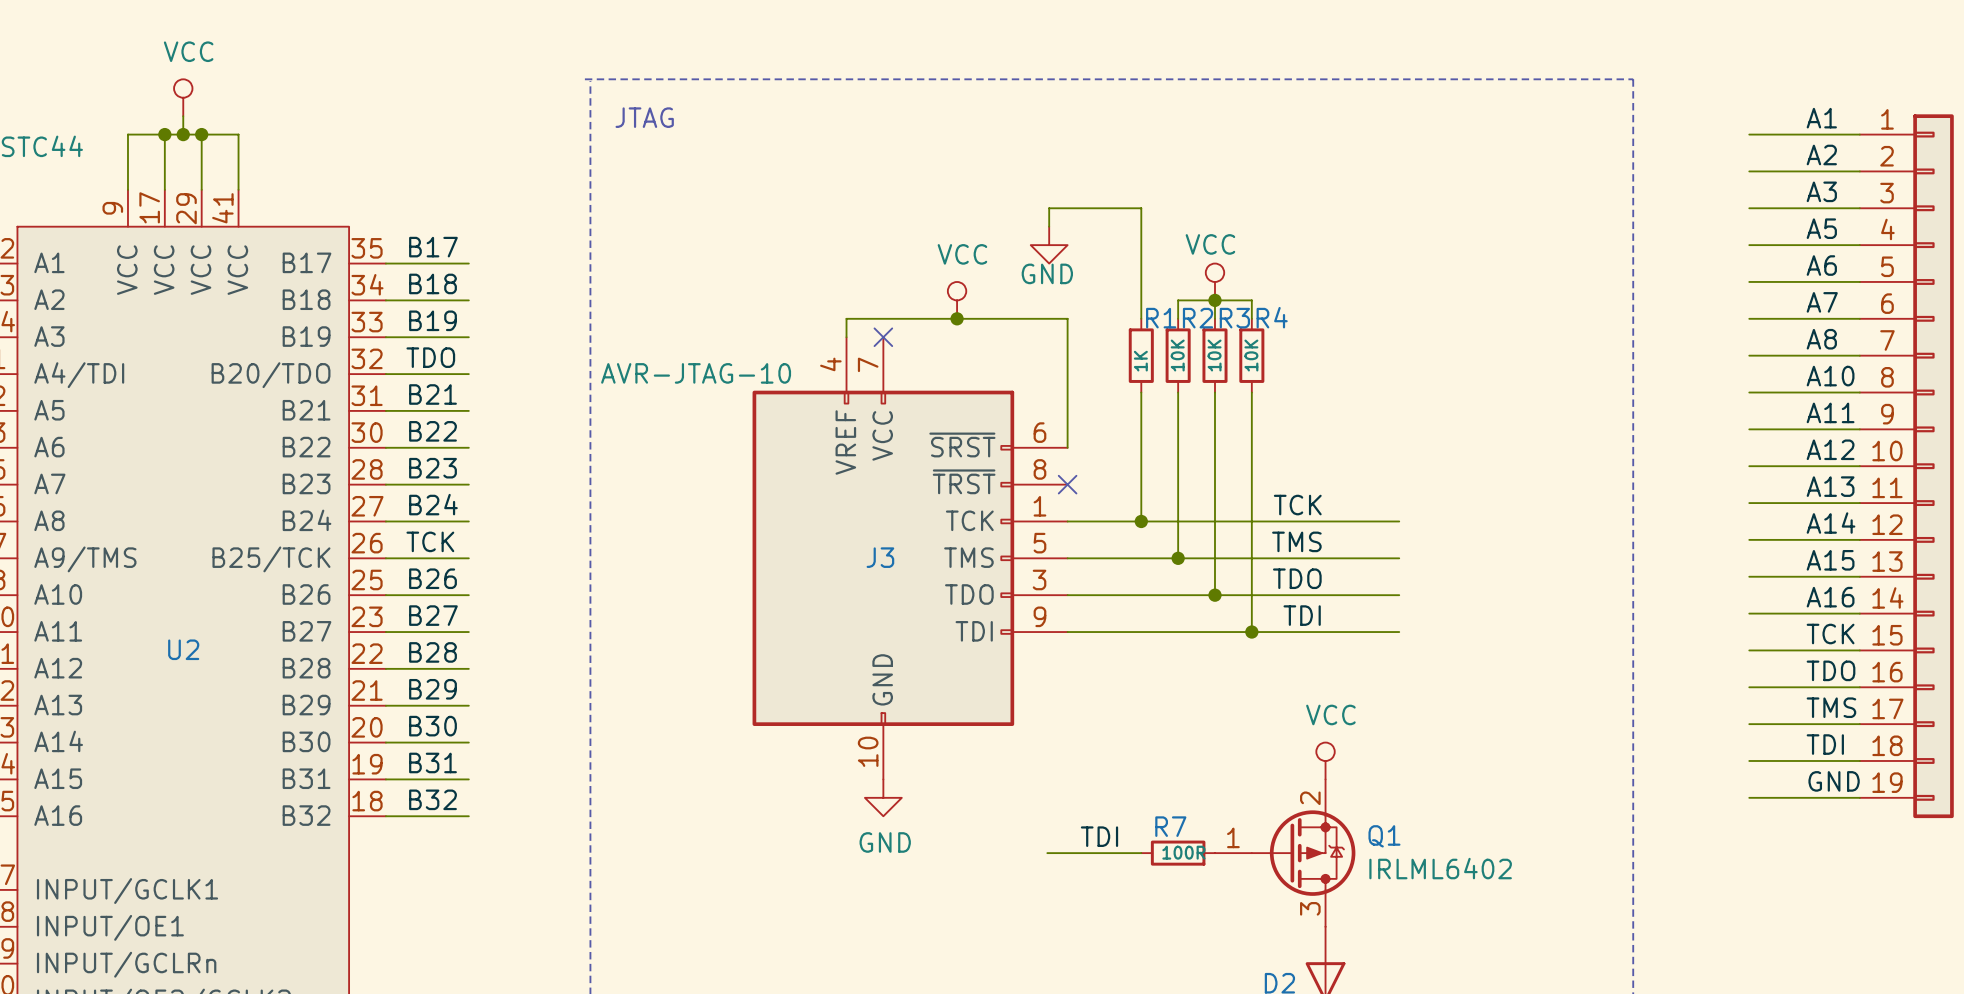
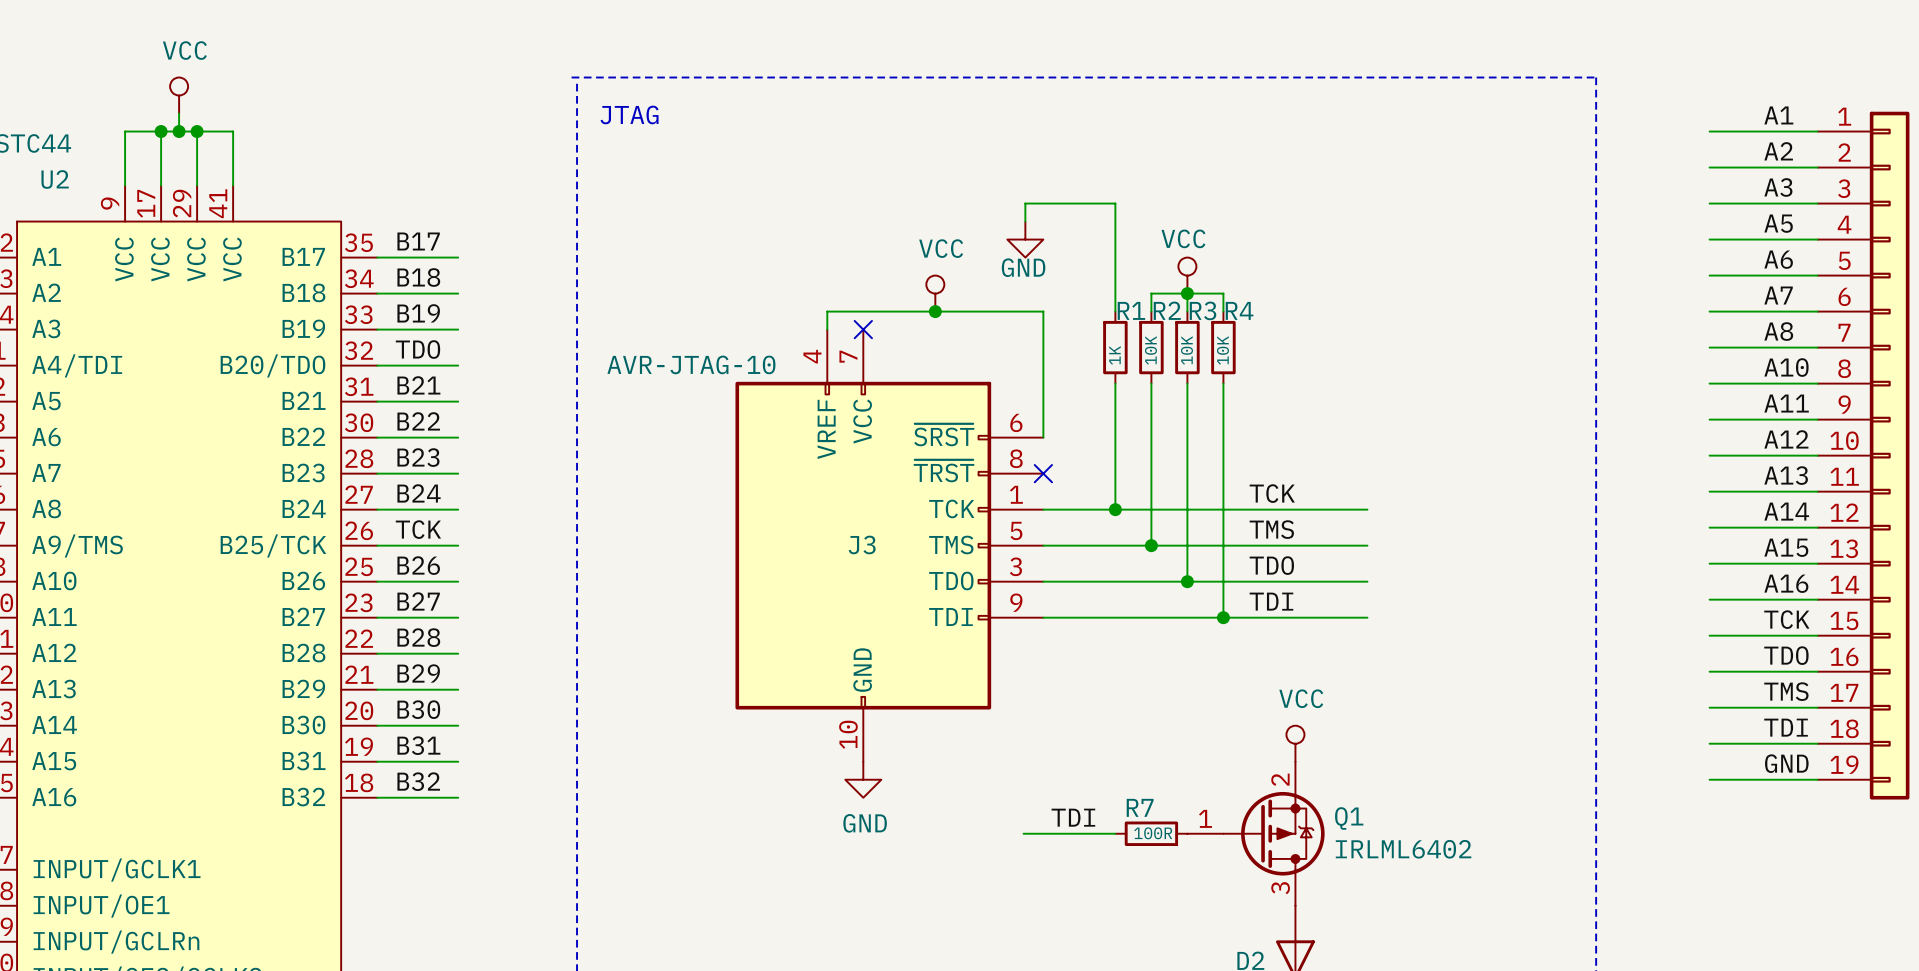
U2 name position: U2 (183, 649) -> U2 (55, 179)

